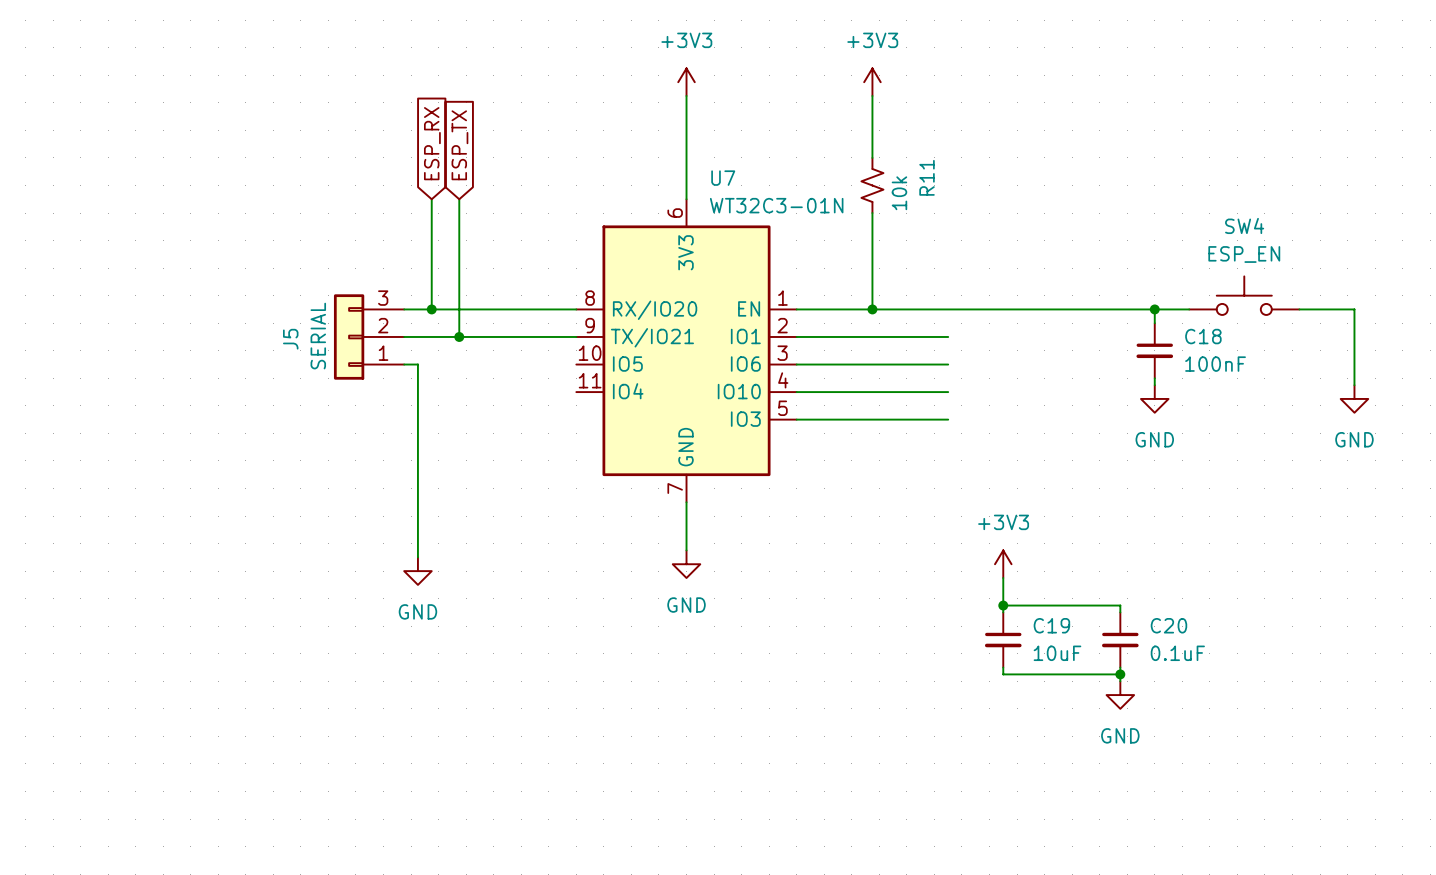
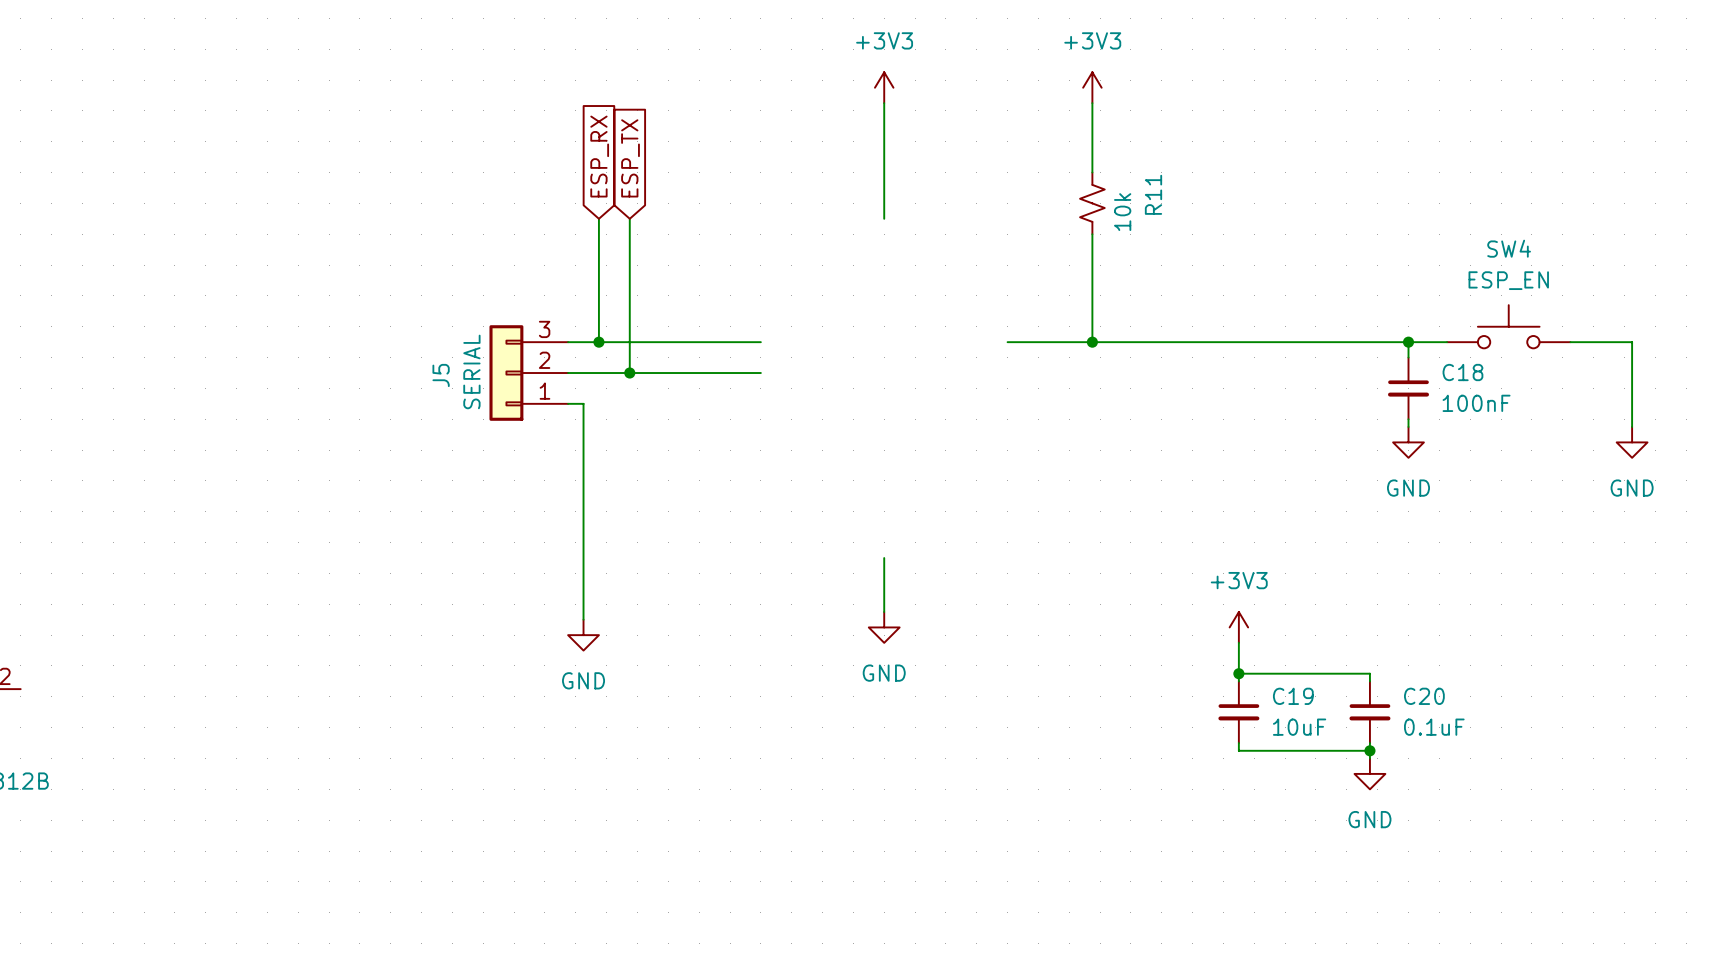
wire: (796, 336) (948, 336) -> none
U7: WT32C3-01N (686, 350) -> none
wire: (796, 364) (948, 364) -> none
wire: (796, 392) (948, 392) -> none
wire: (796, 419) (948, 419) -> none

